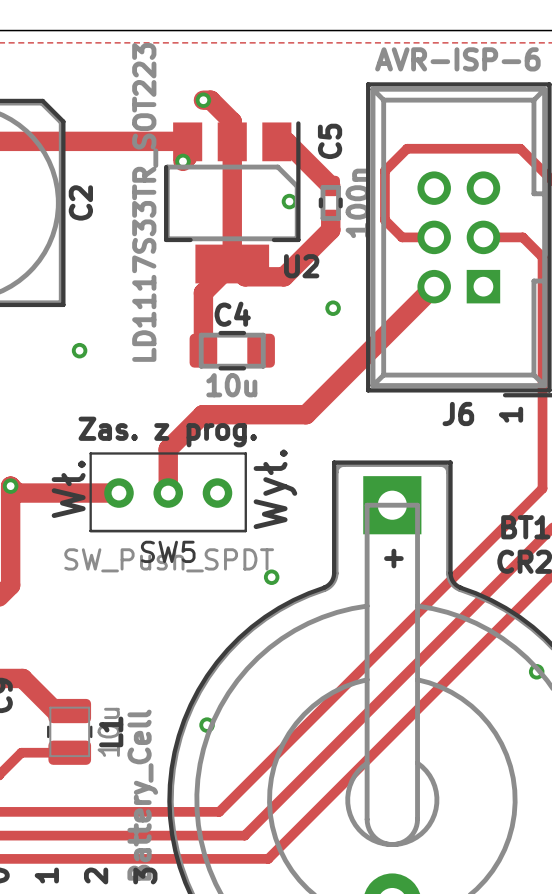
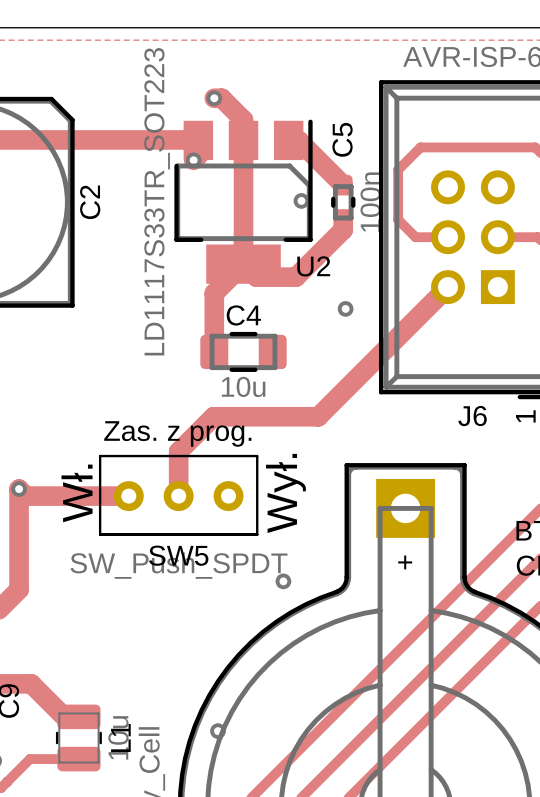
via: (79, 350) -> none

